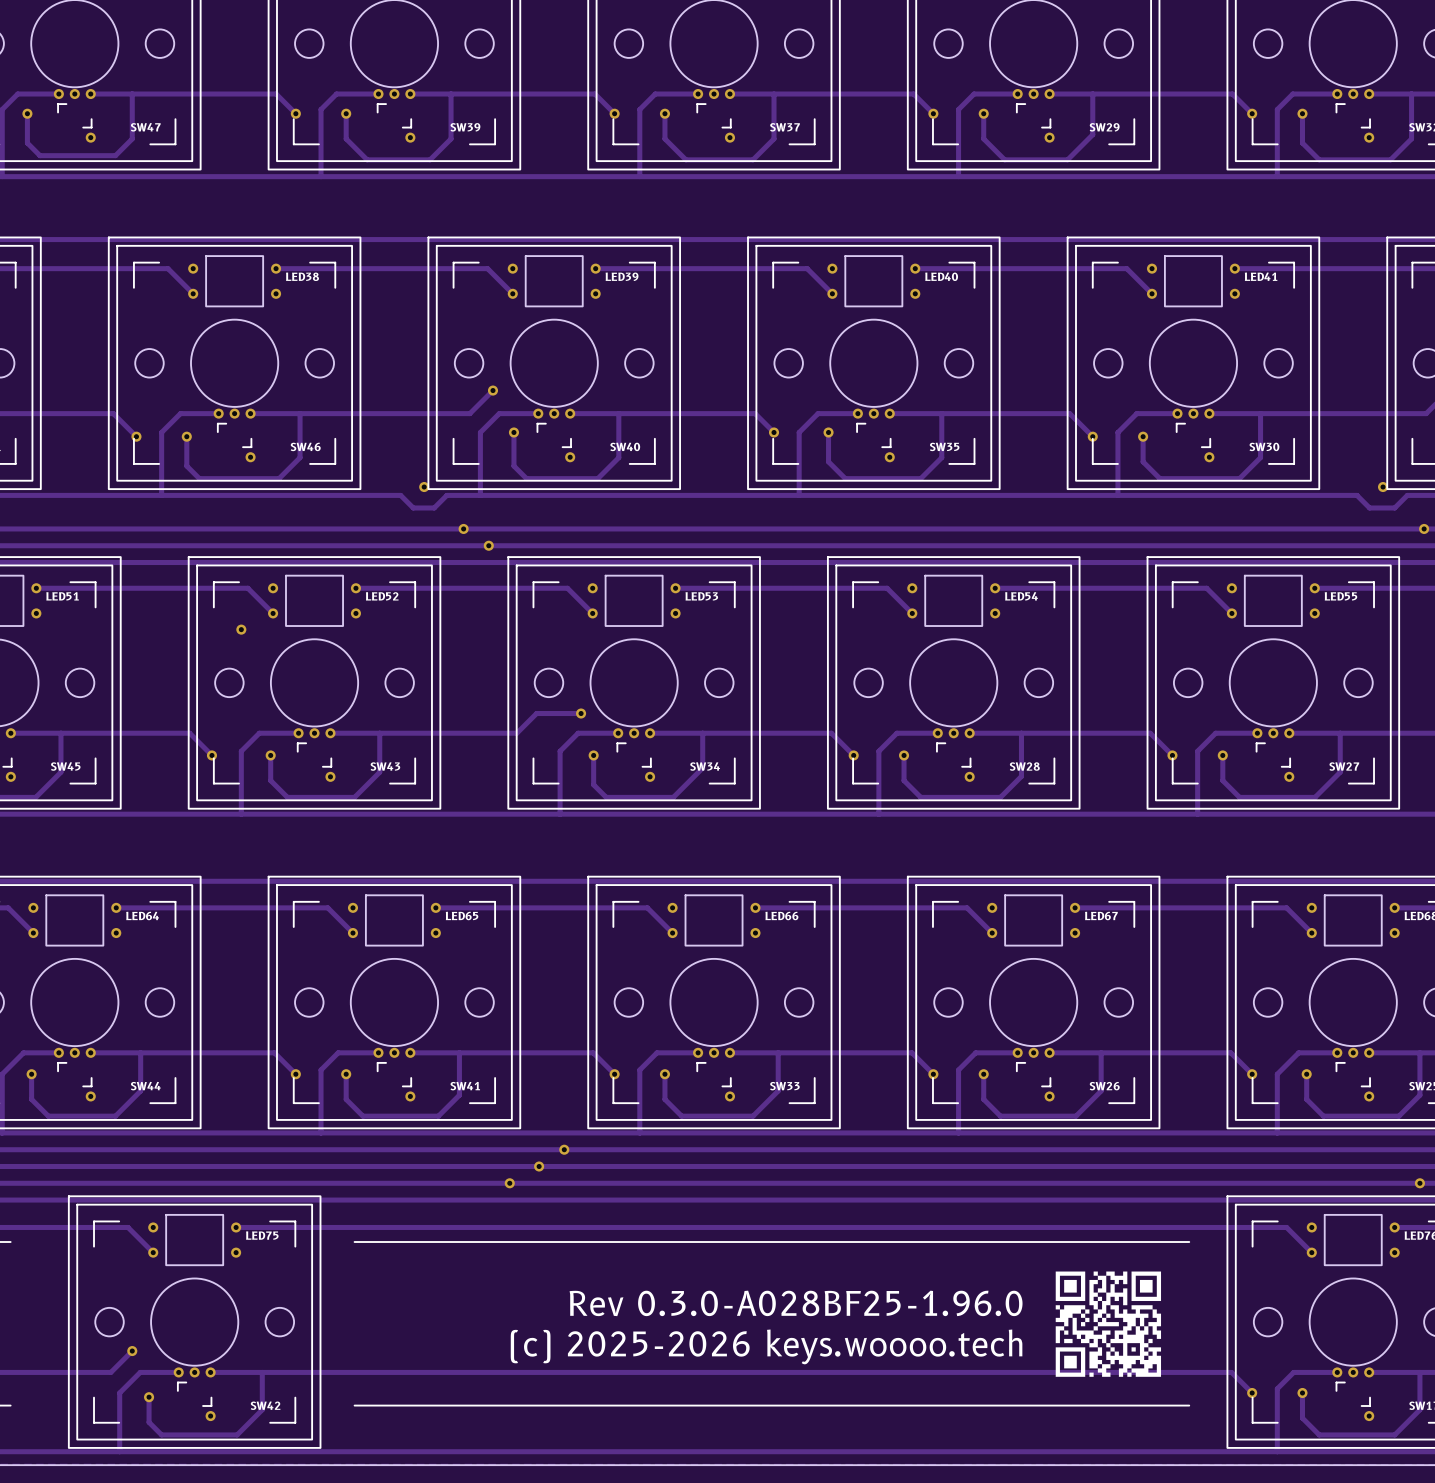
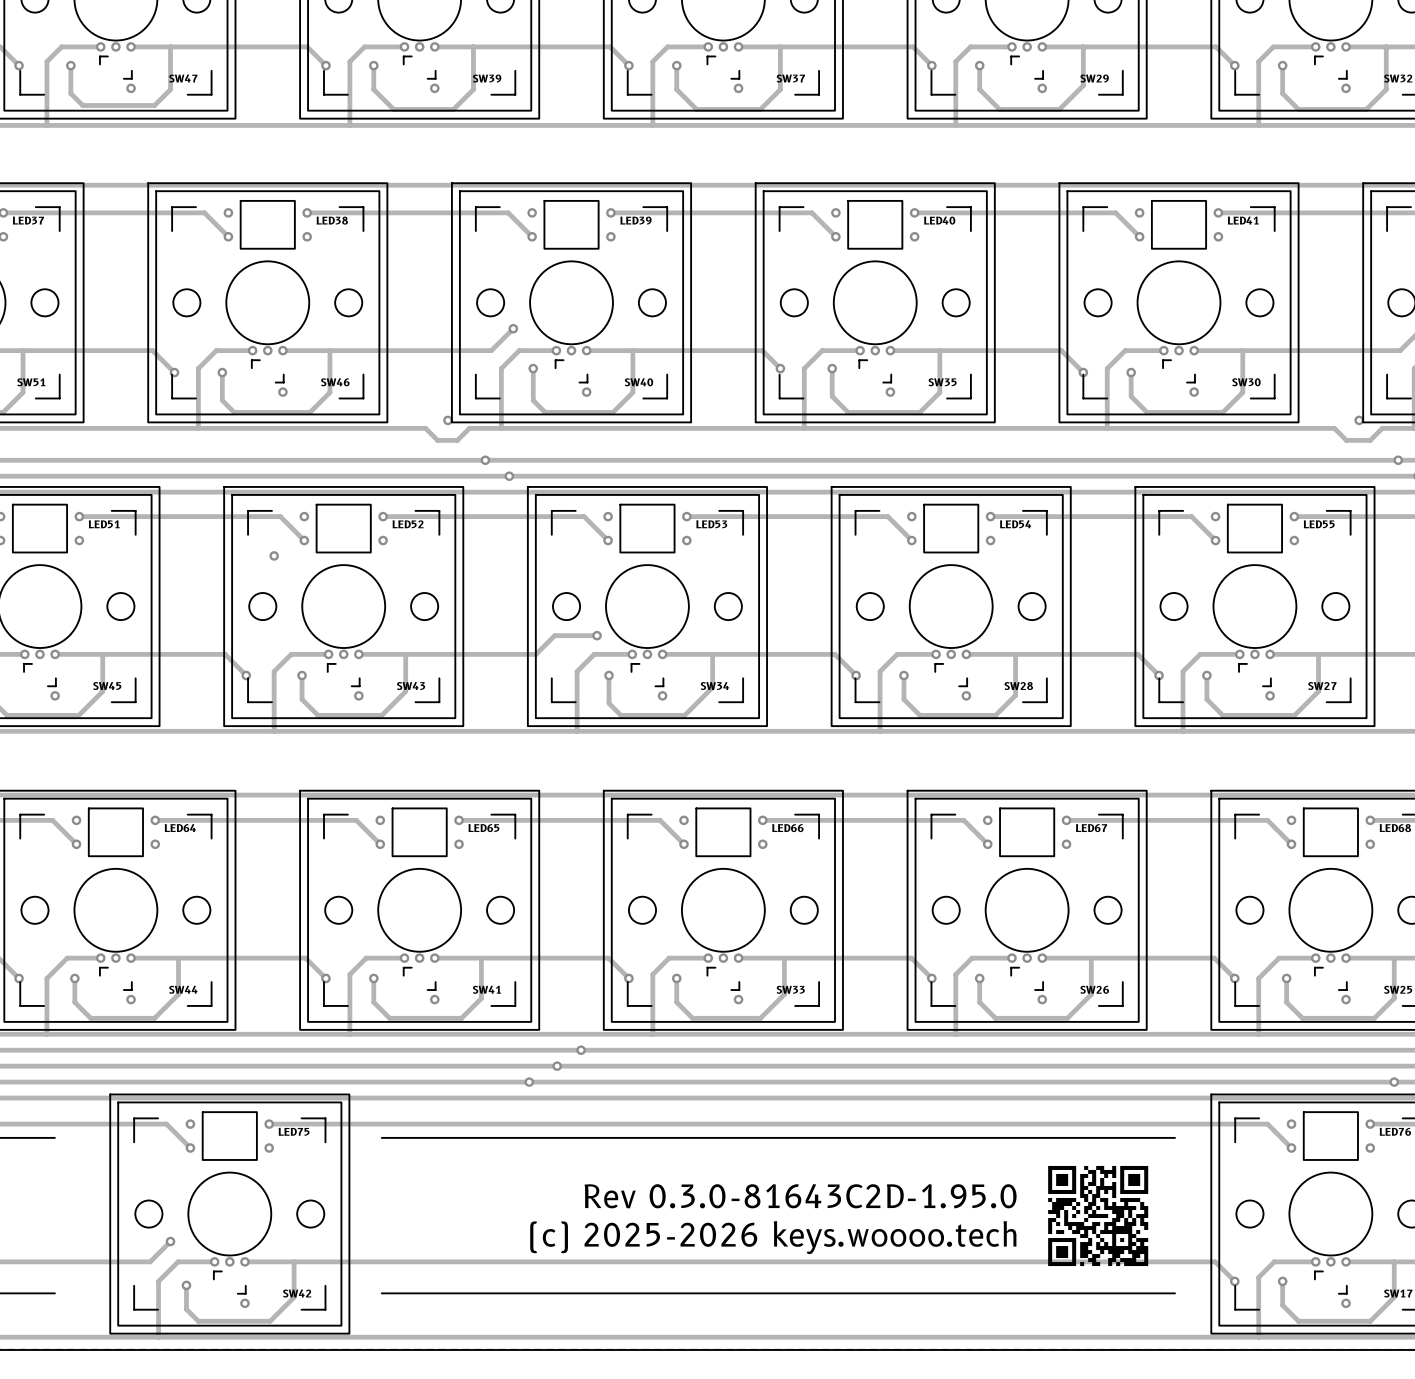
text: Rev 0.3.0-A028BF25-1.96.0 (796, 1303) -> Rev 0.3.0-81643C2D-1.95.0 (800, 1196)

